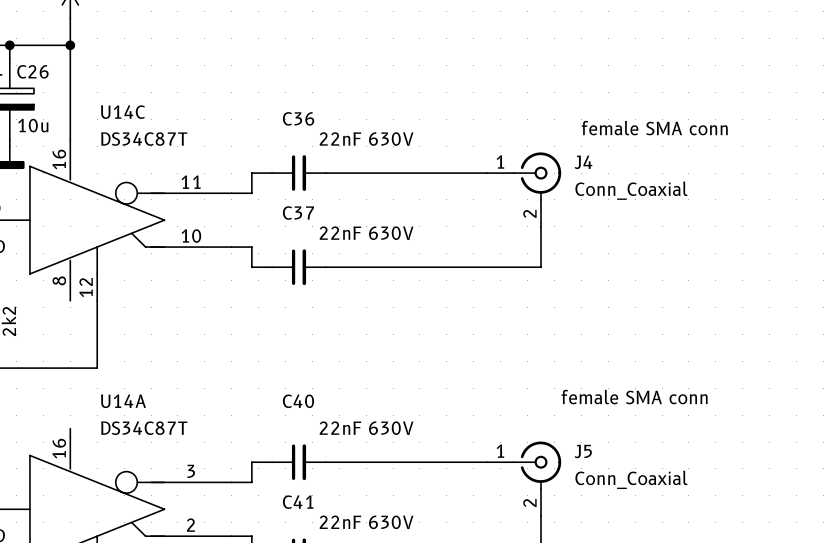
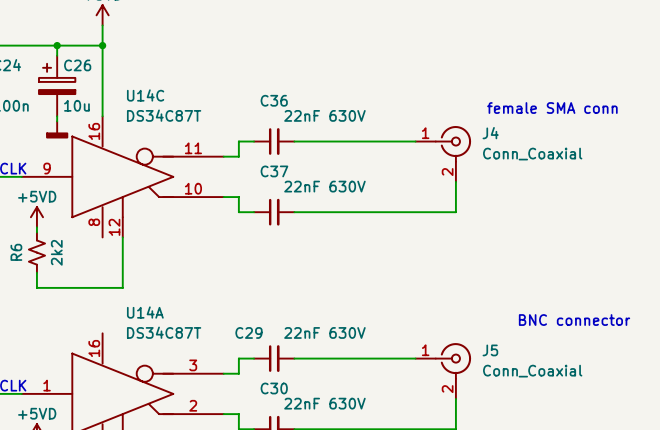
text: female SMA conn (634, 397) -> none
C40 name: C40 (298, 401) -> C29 (248, 332)
text: none -> BNC connector (574, 320)
C41 name: C41 (298, 502) -> C30 (274, 388)

